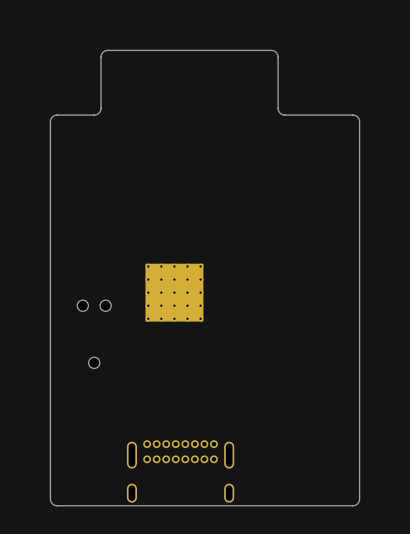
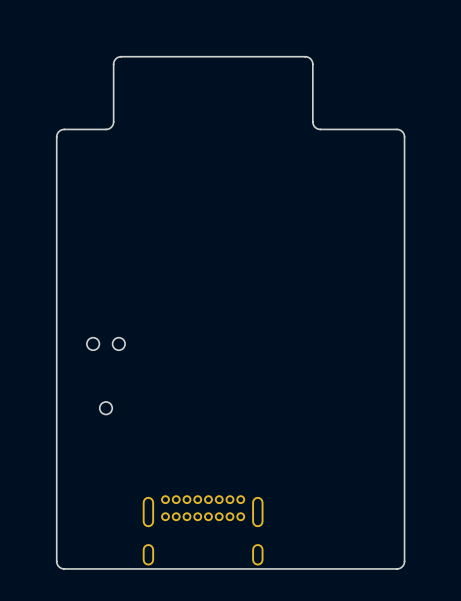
part: (174, 292) -> none

